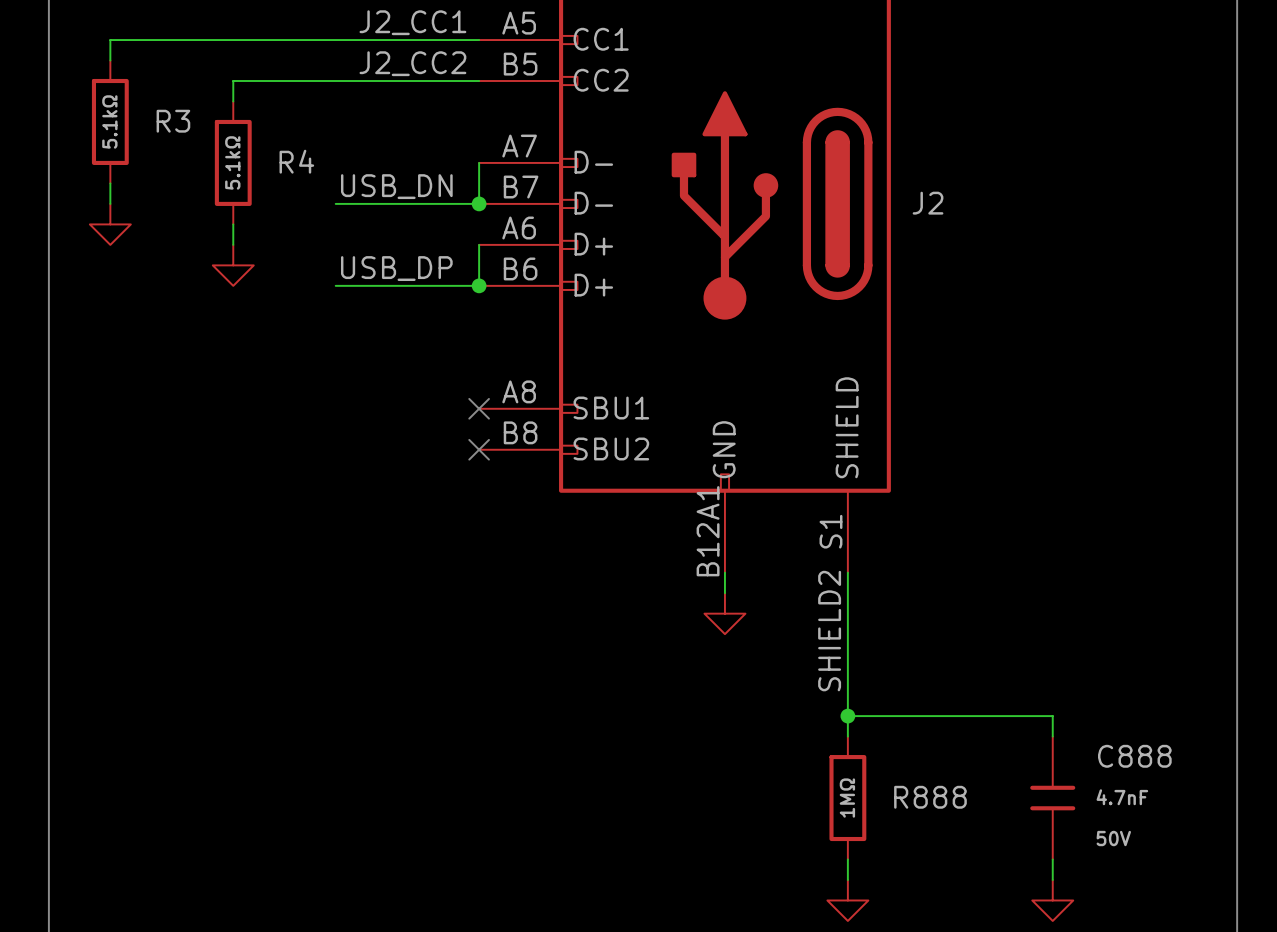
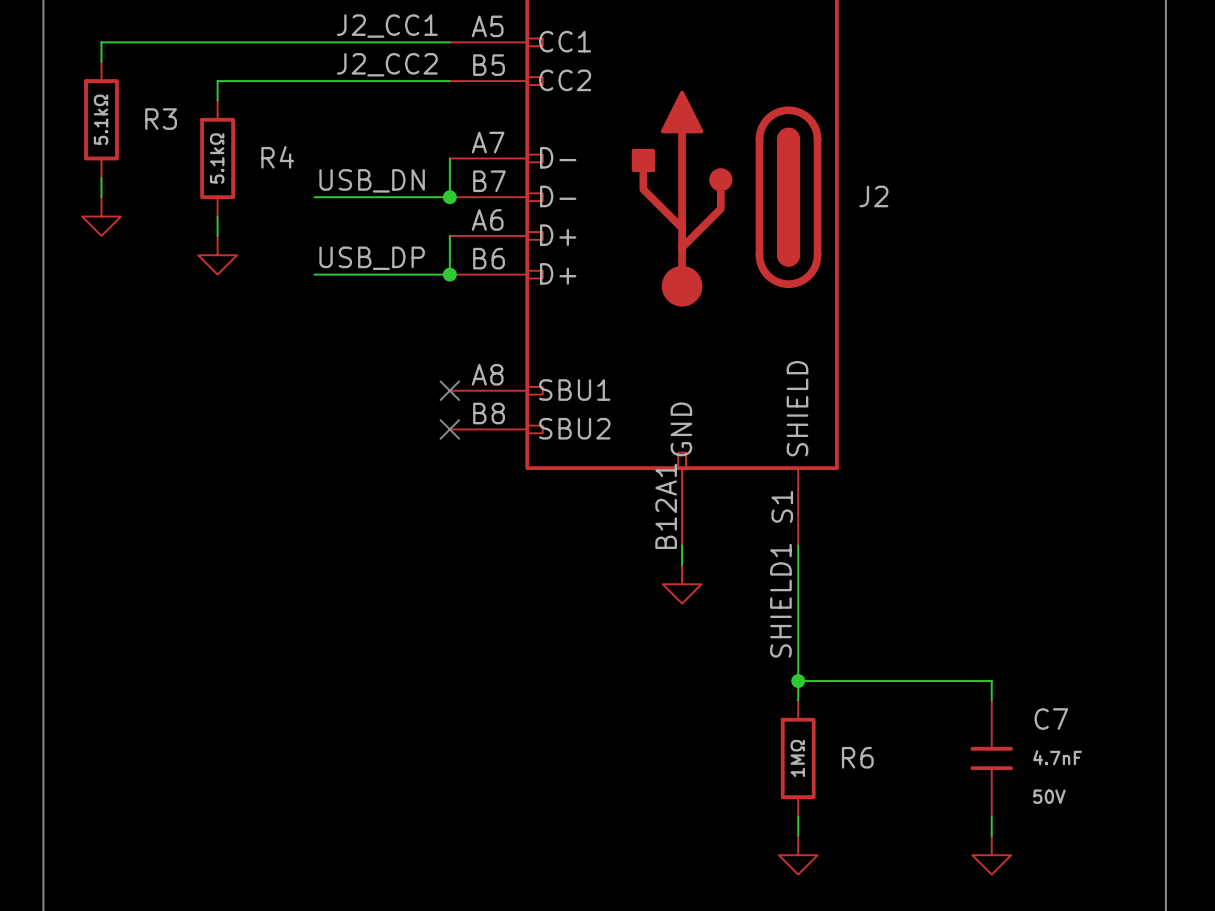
label: SHIELD2 (829, 631) -> SHIELD1 (780, 600)
C888 name: C888 (1134, 756) -> C7 (1051, 719)
R888 name: R888 (930, 797) -> R6 (857, 757)

